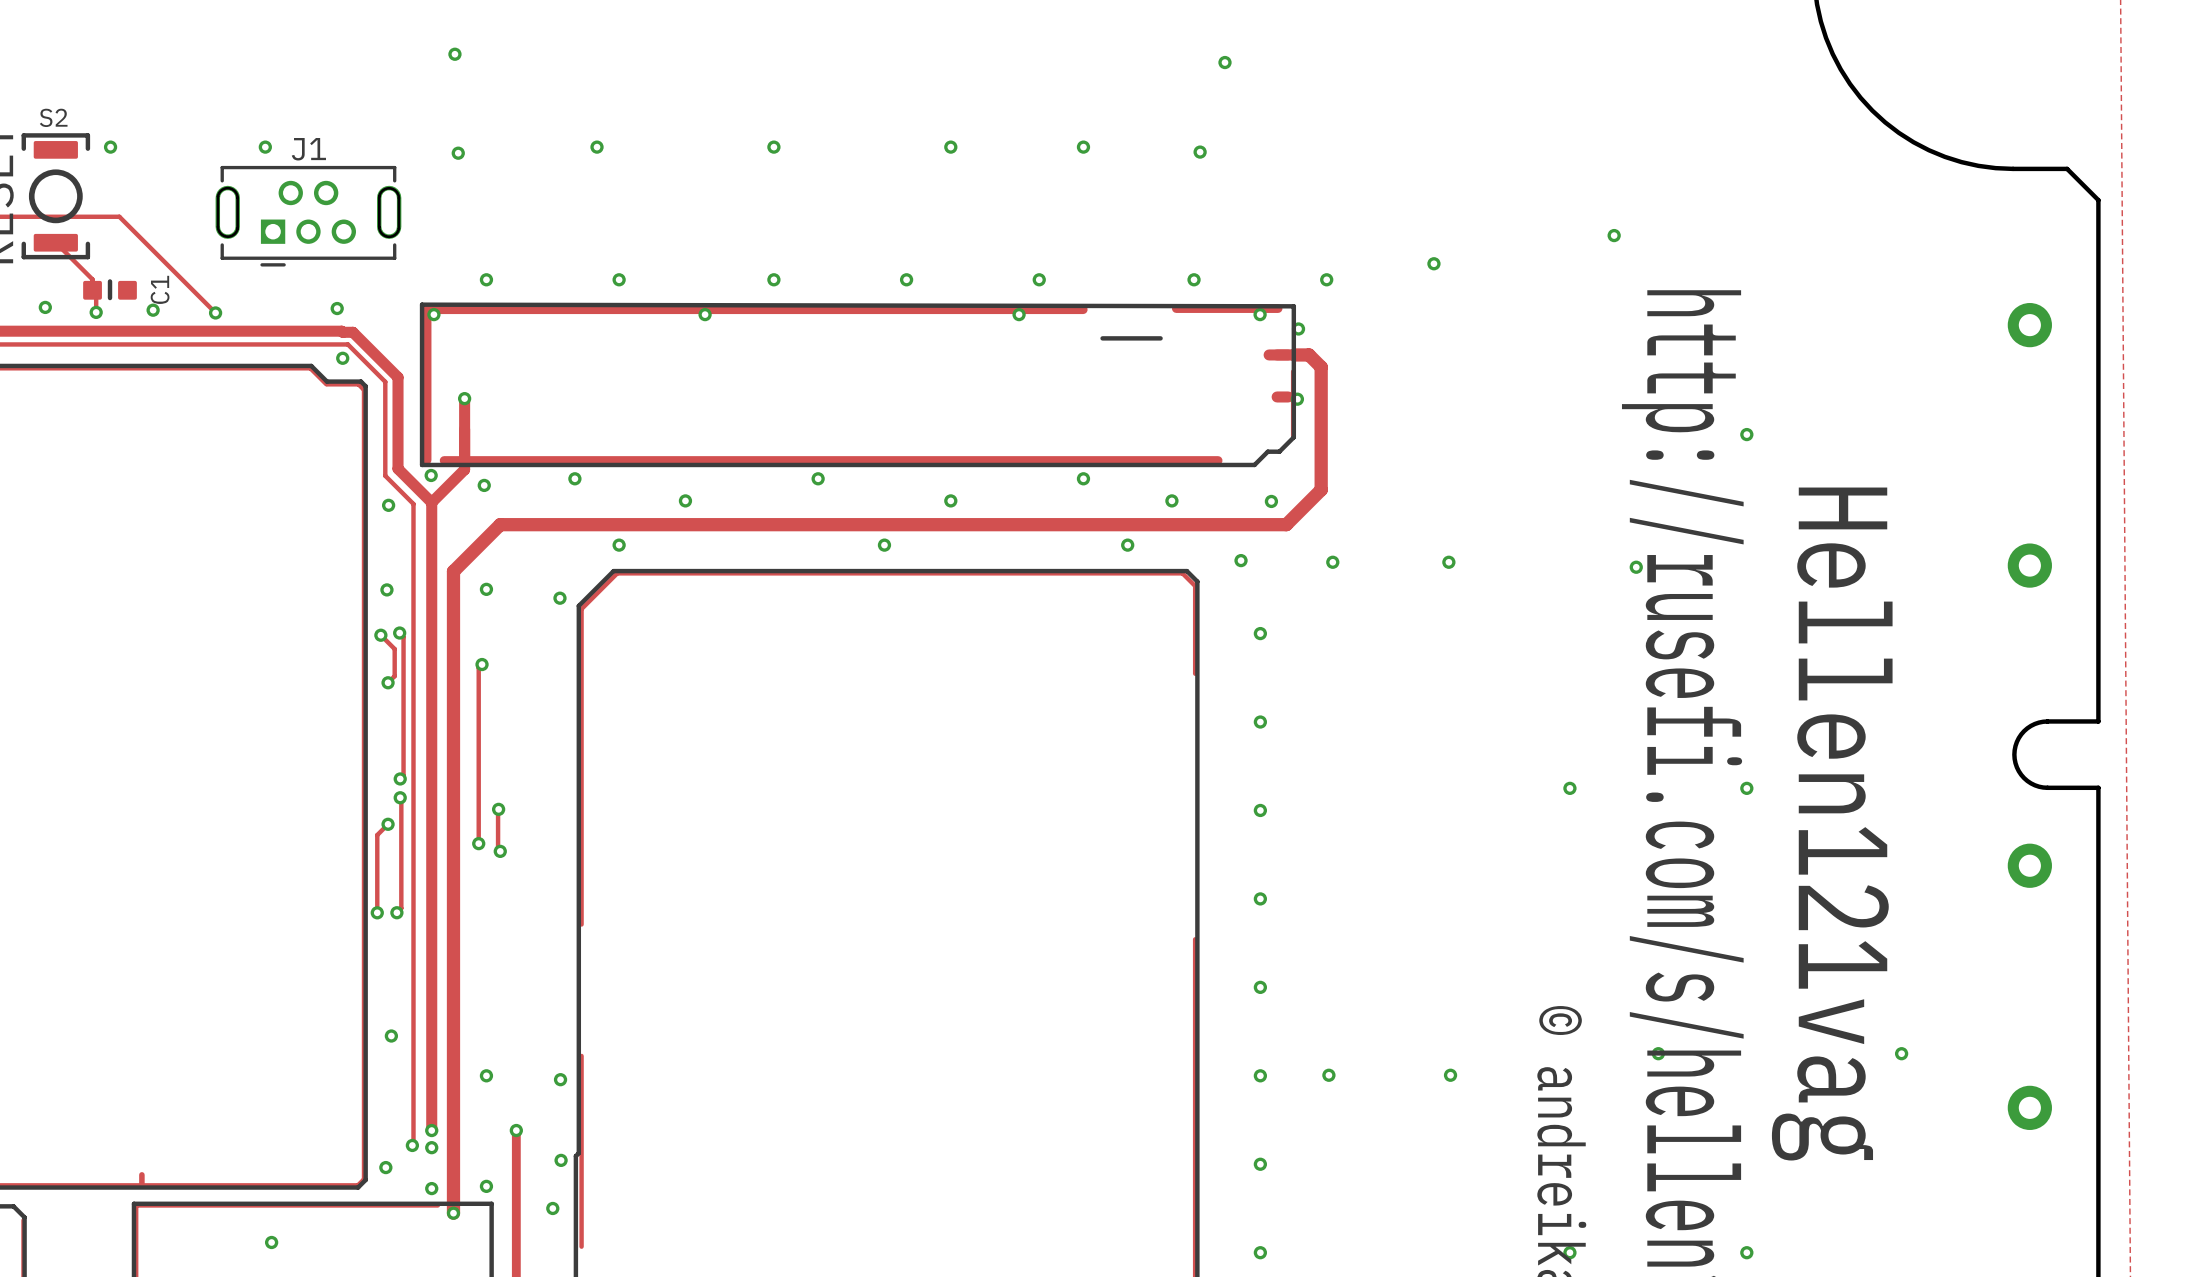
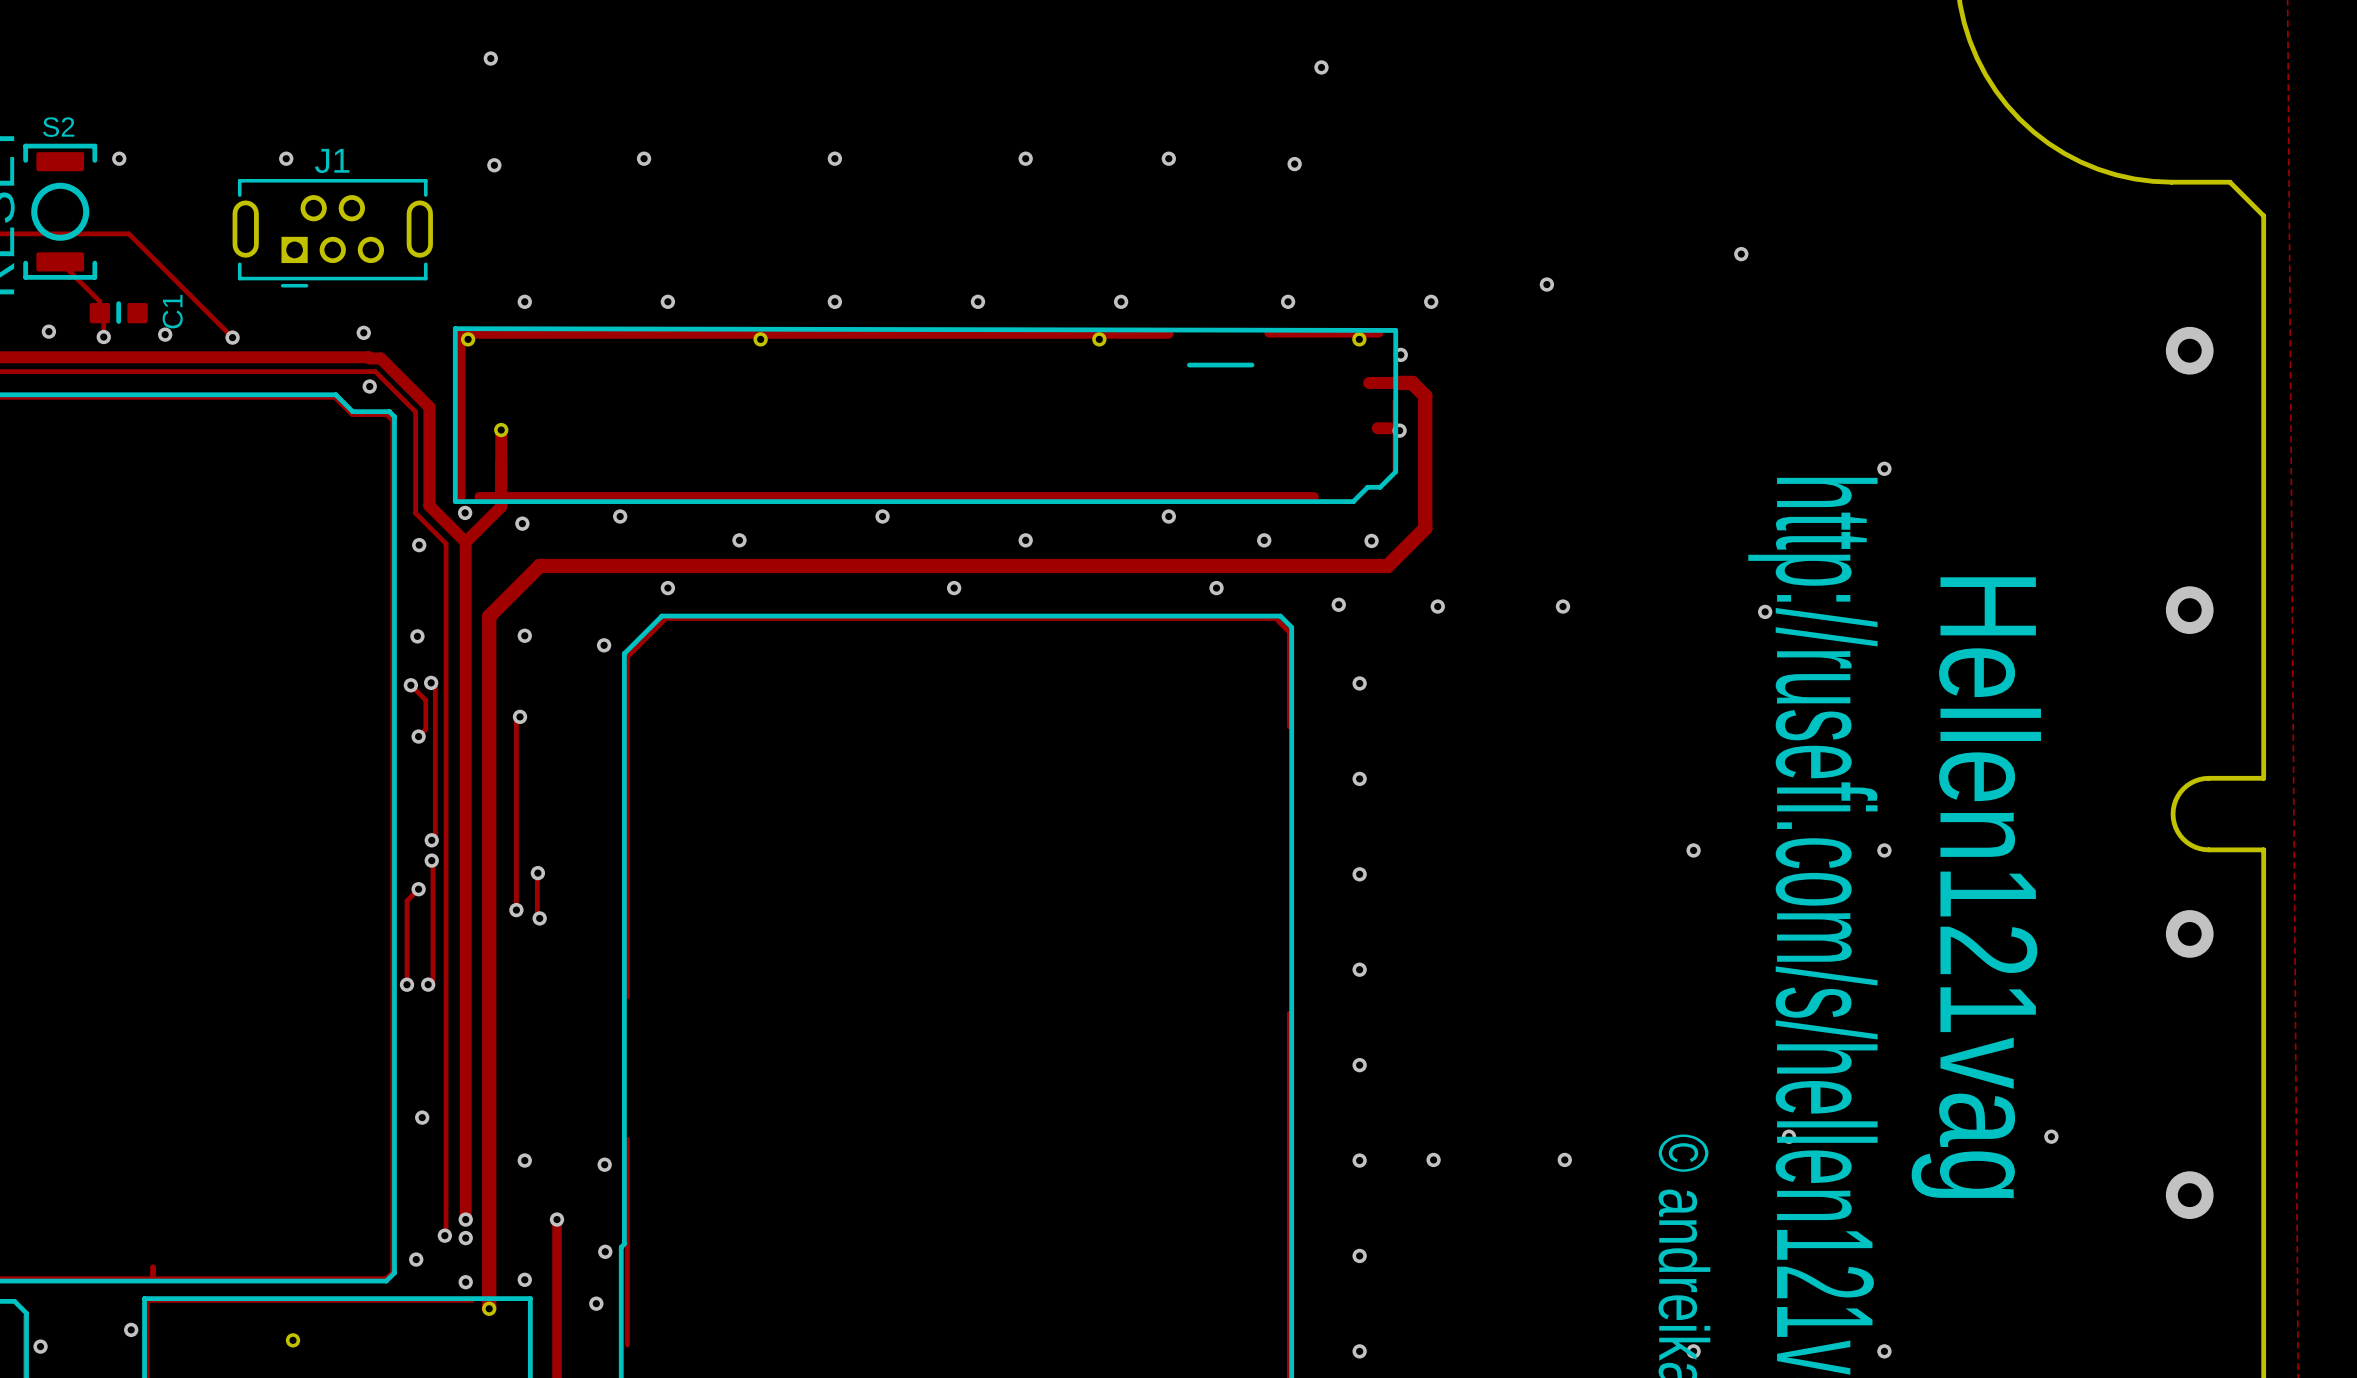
via: none -> (131, 1329)
via: none -> (40, 1346)

